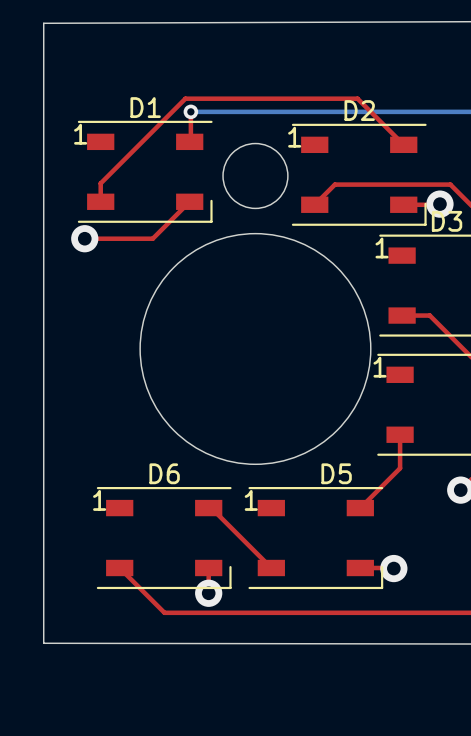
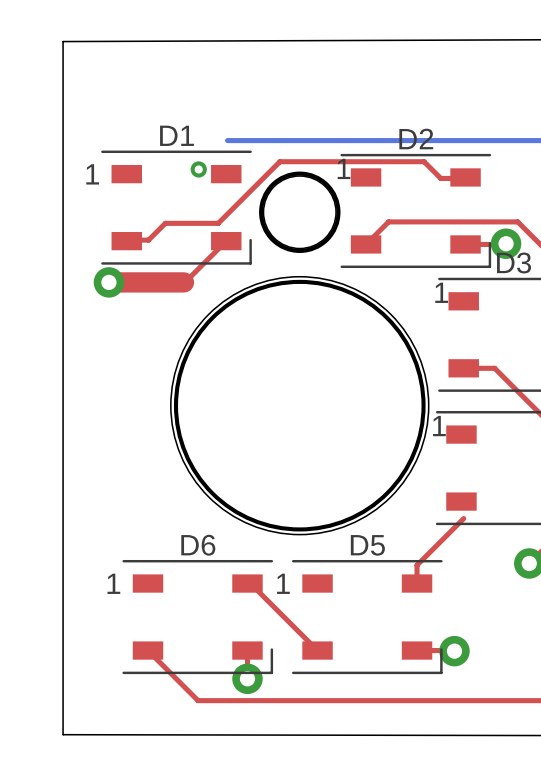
top track: (190, 111) (190, 140) -> none
via position: (190, 111) -> (198, 169)
D1 text position: 1 (80, 134) -> 1 (92, 174)
round board edge: none -> [259, 171, 341, 253]
top track: (403, 144) (357, 98) (185, 98) (100, 183) (100, 201) -> none
top track: none -> (462, 178) (440, 178) (424, 161) (279, 161) (218, 223) (165, 223) (148, 240) (126, 240)
round board edge: none -> [173, 279, 426, 532]
top track width: thin (84, 238) (151, 238) -> thick (108, 282) (183, 282)
top track: (400, 434) (400, 468) (360, 508) -> none
top track: none -> (463, 518) (417, 565) (417, 584)
D5 name position: D5 (336, 473) -> D5 (367, 545)
D6 text position: 1 (99, 500) -> 1 (113, 583)
D5 text position: 1 (251, 500) -> 1 (283, 583)

